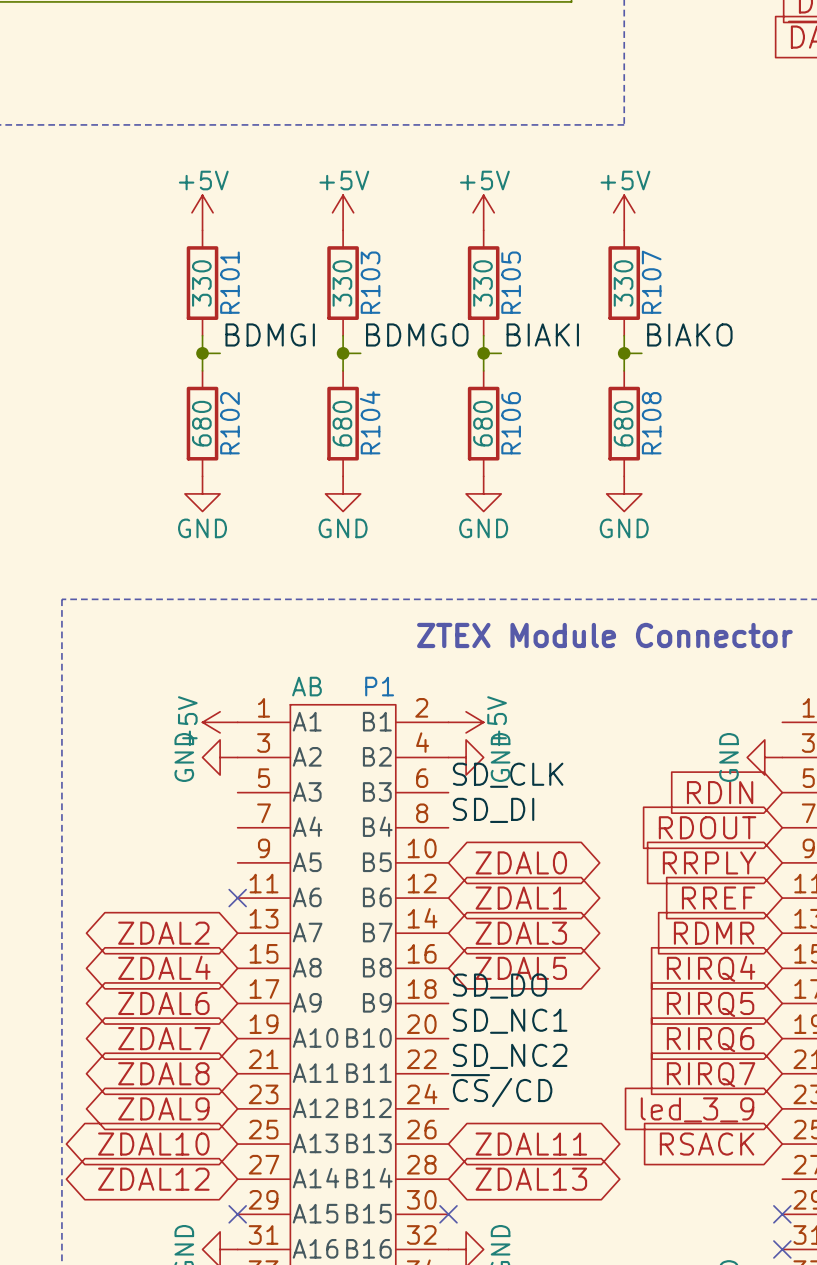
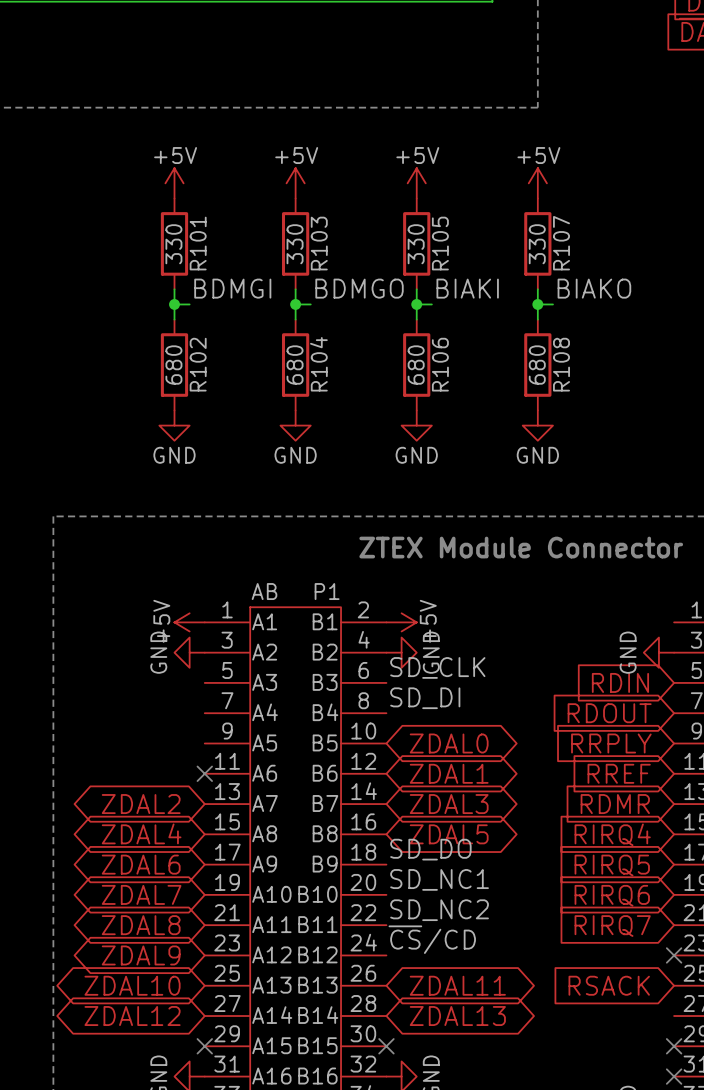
no-connect mark: none -> (674, 955)
global label: led_3_9 (697, 1109) -> none

